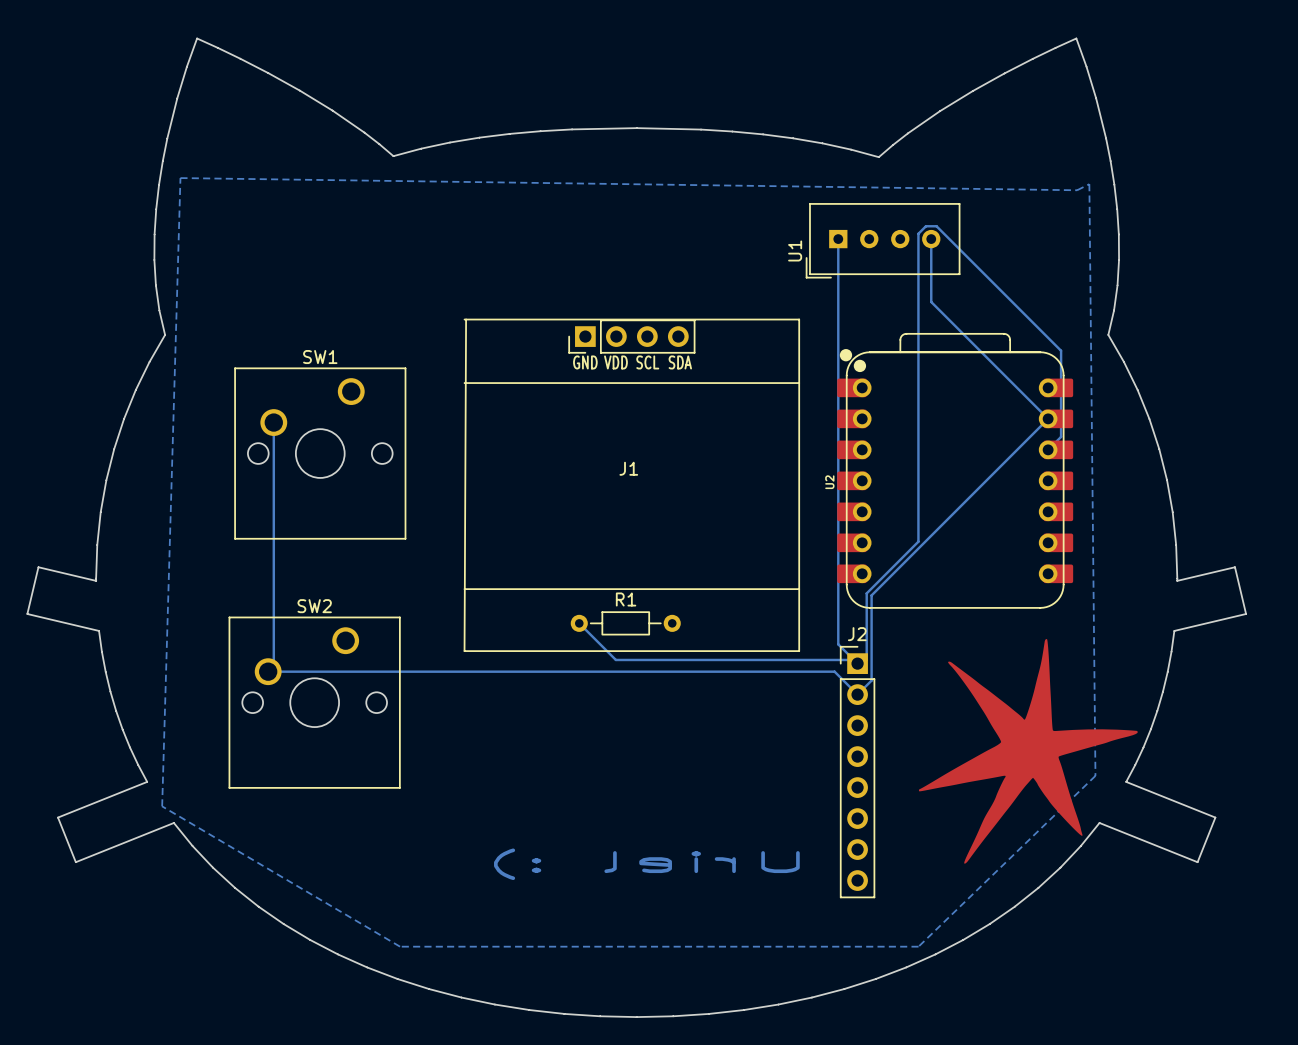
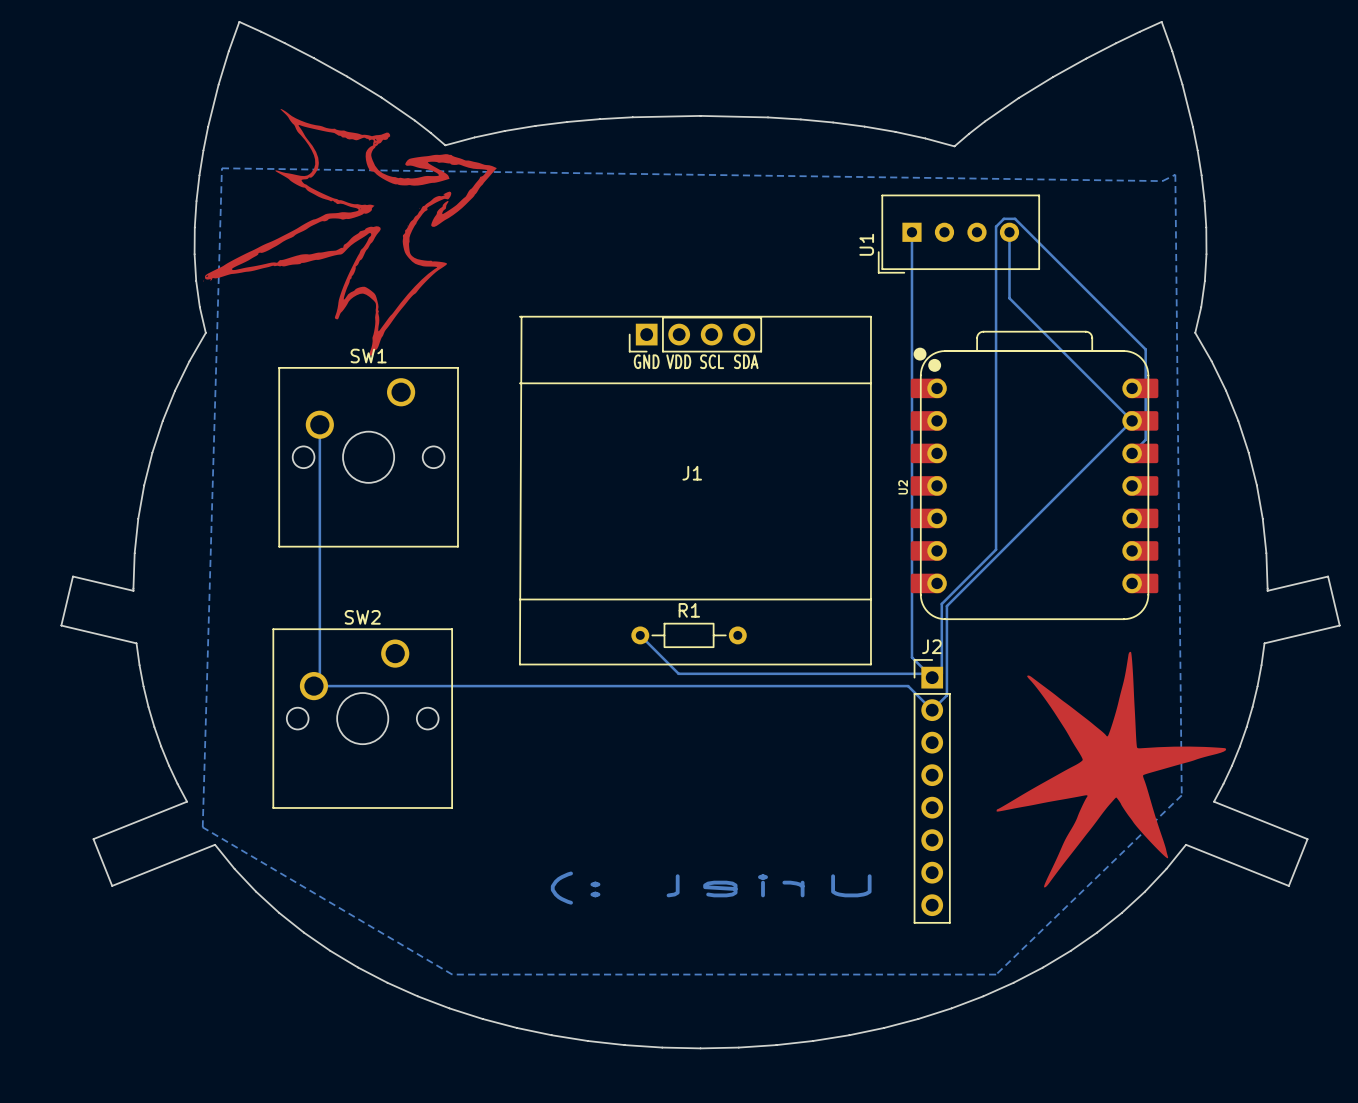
drawing: none -> [203, 108, 497, 356]

